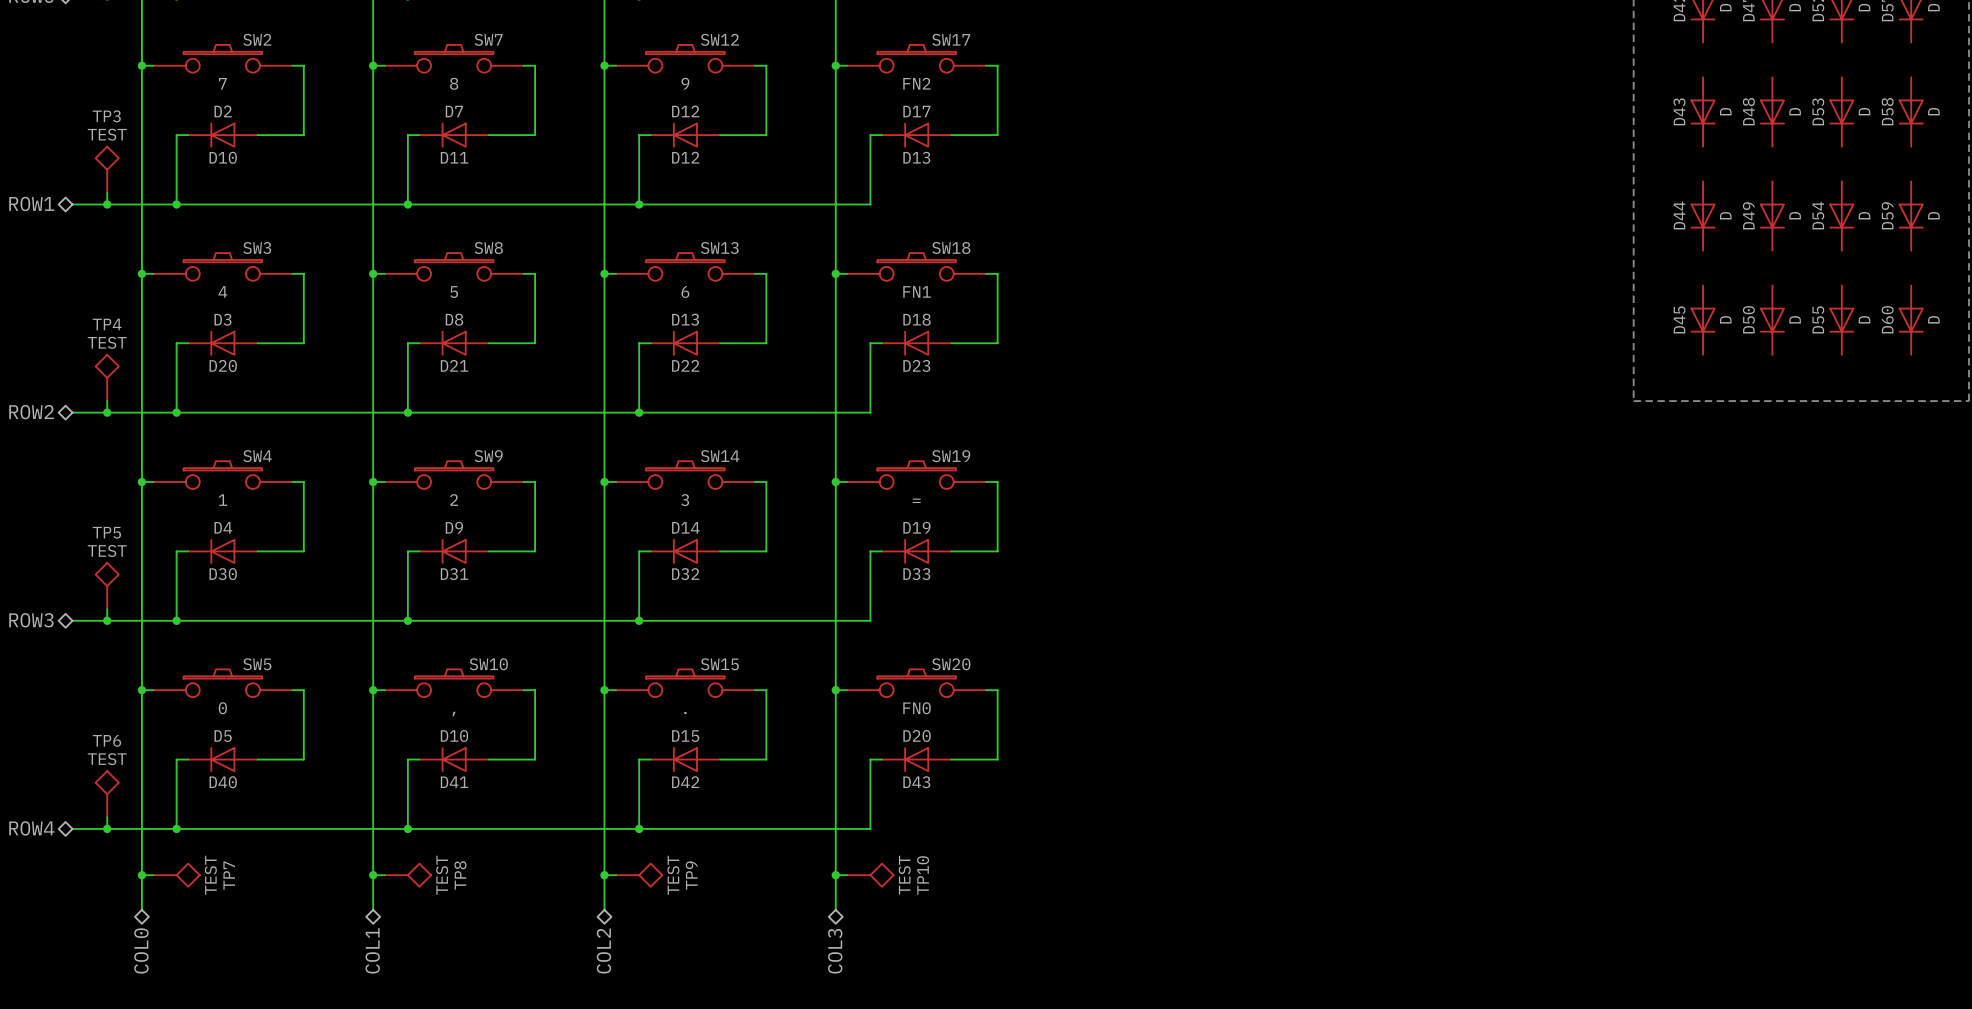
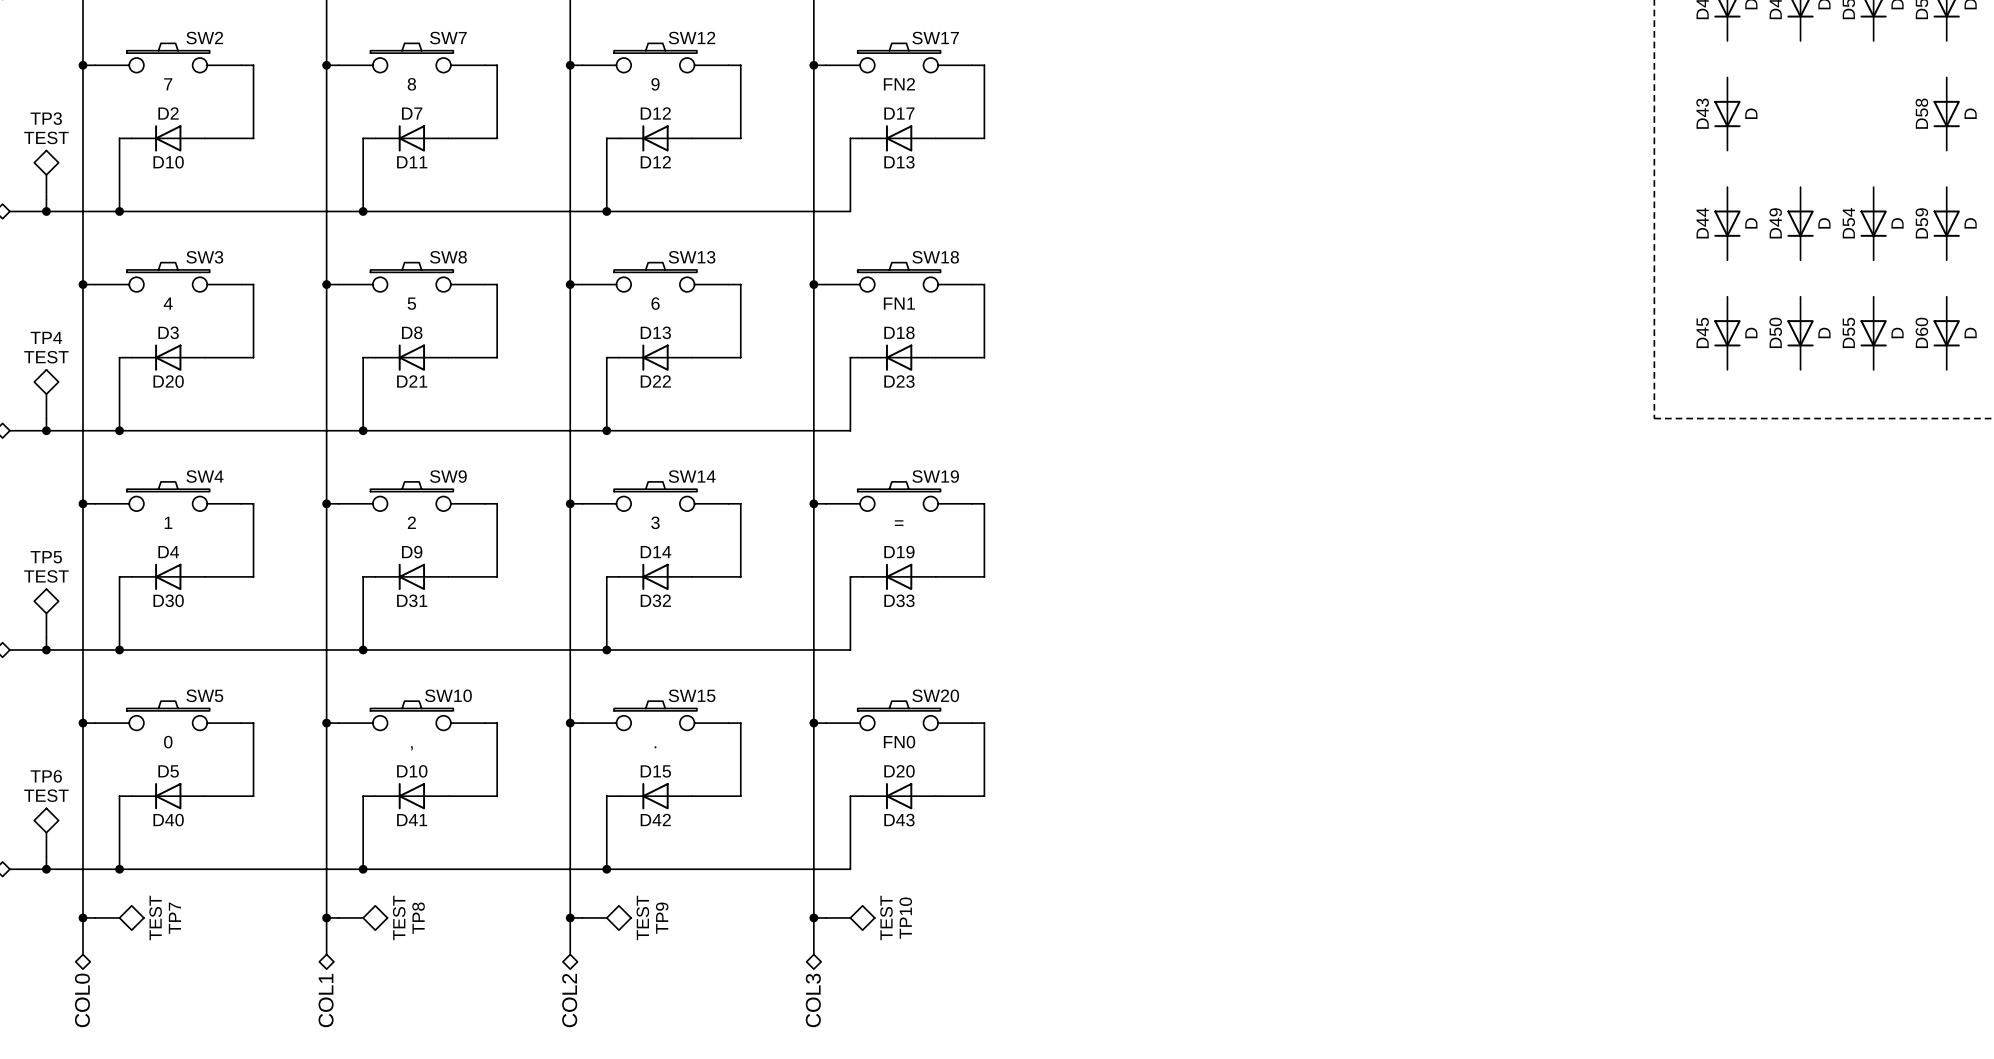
D48: D (1772, 111) -> none
D53: D (1841, 111) -> none

